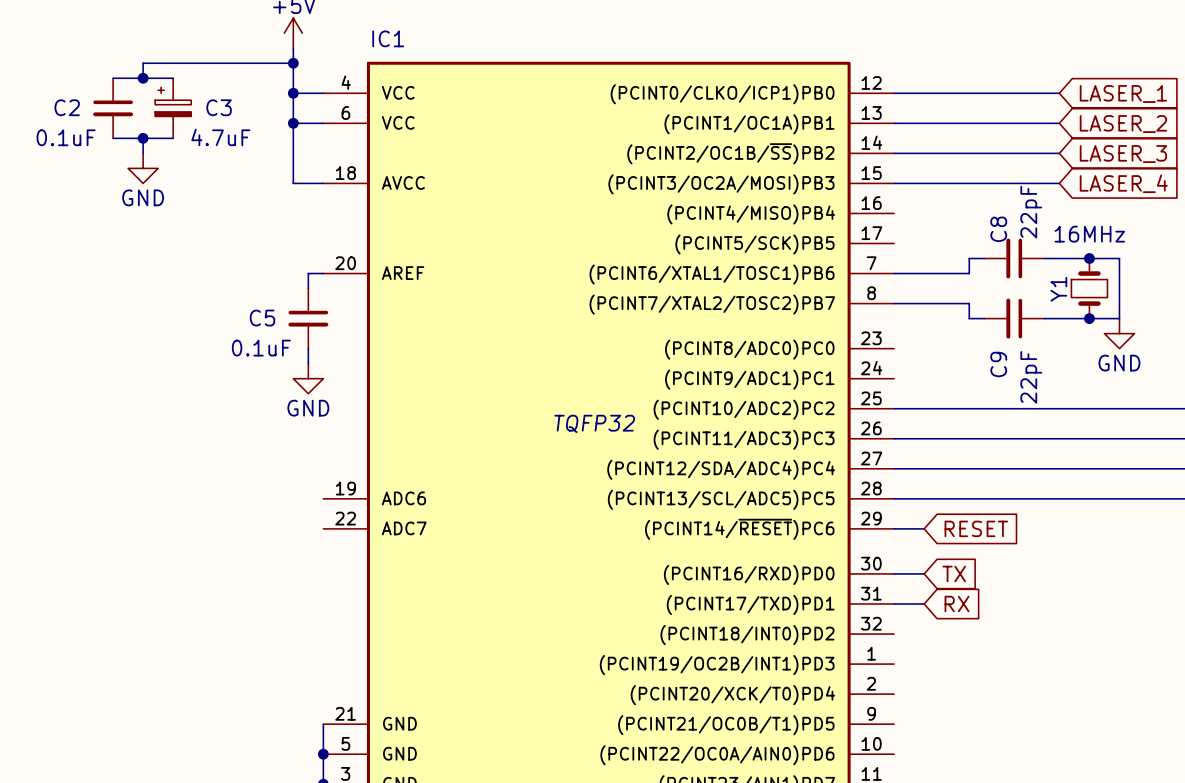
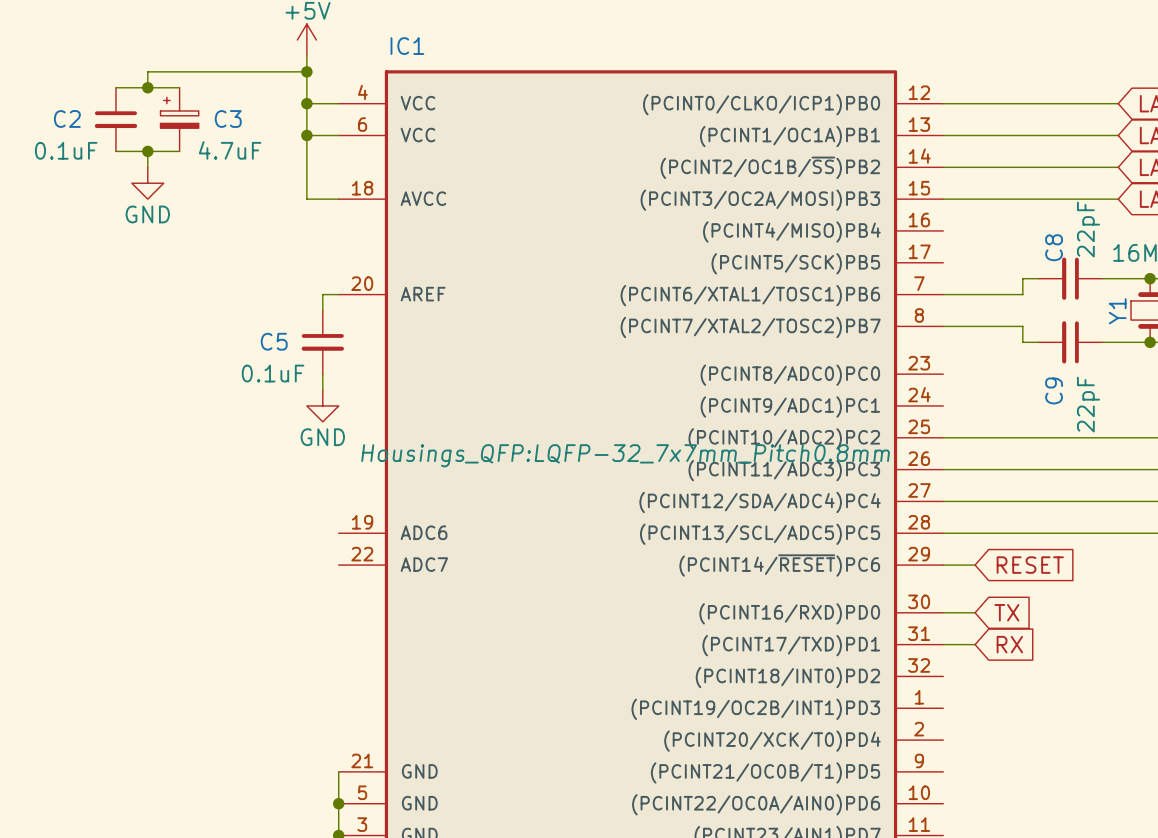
IC1 text: TQFP32 (594, 423) -> Housings_QFP:LQFP-32_7x7mm_Pitch0.8mm (625, 455)

